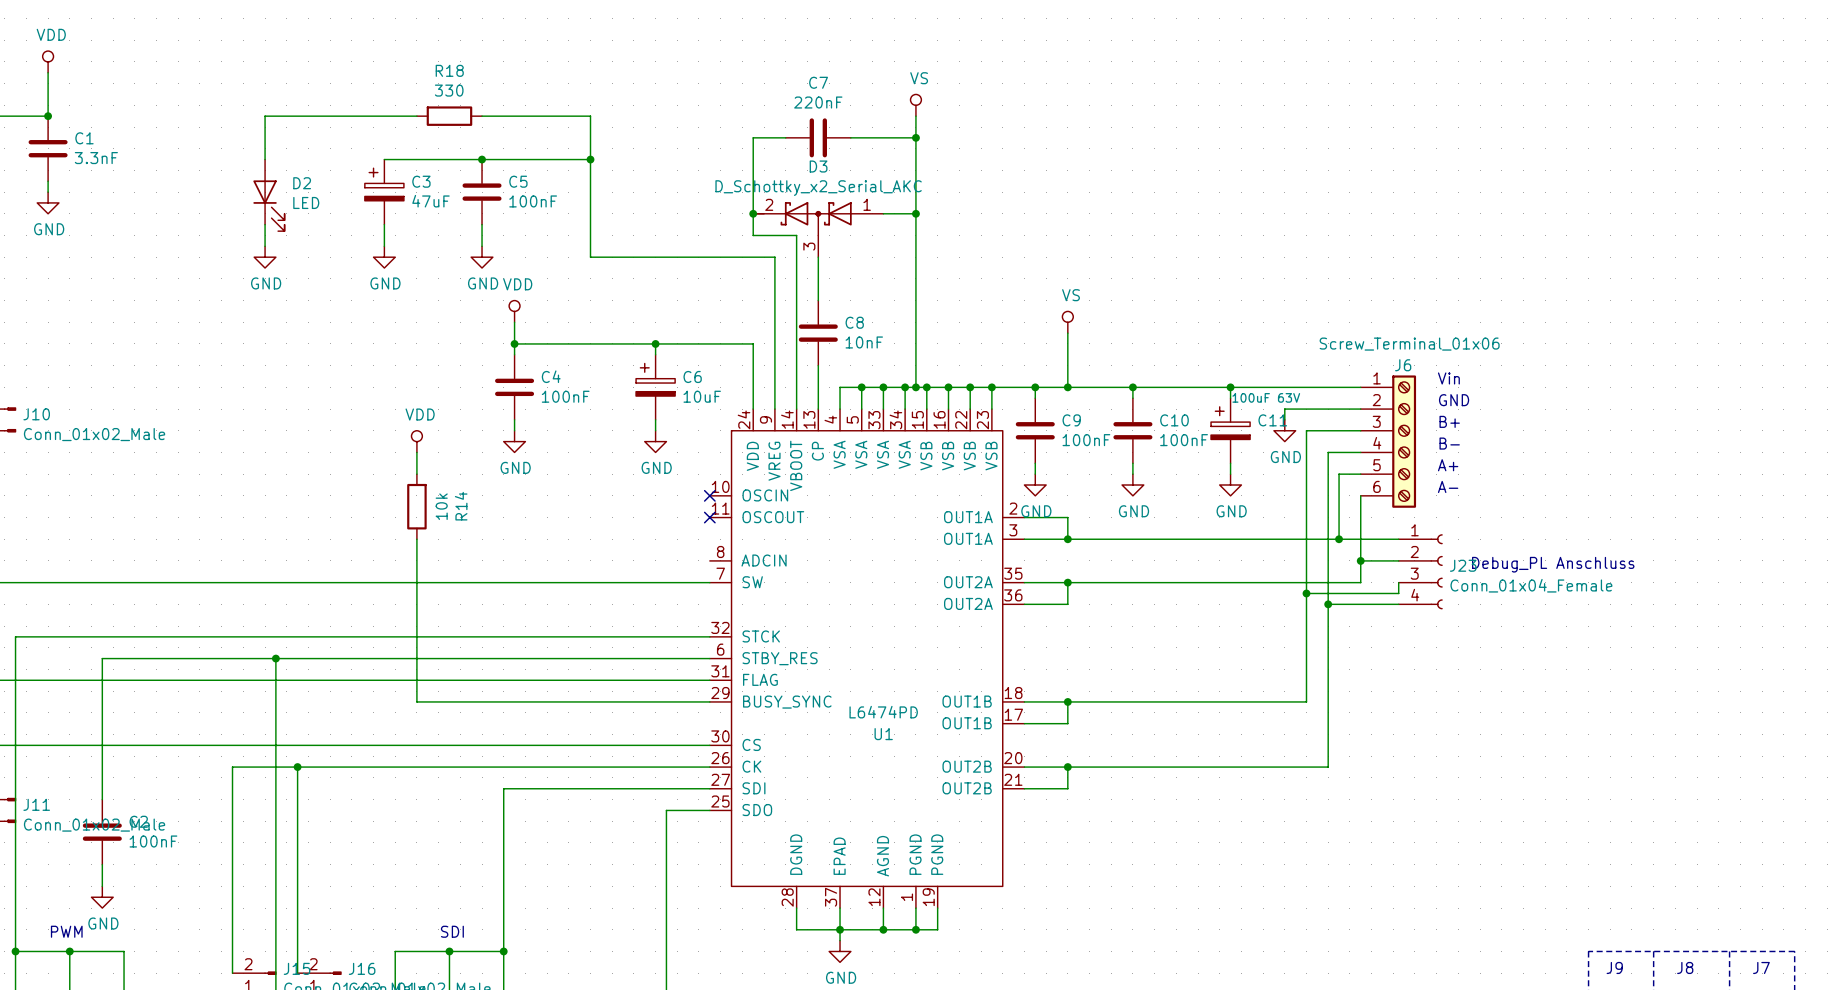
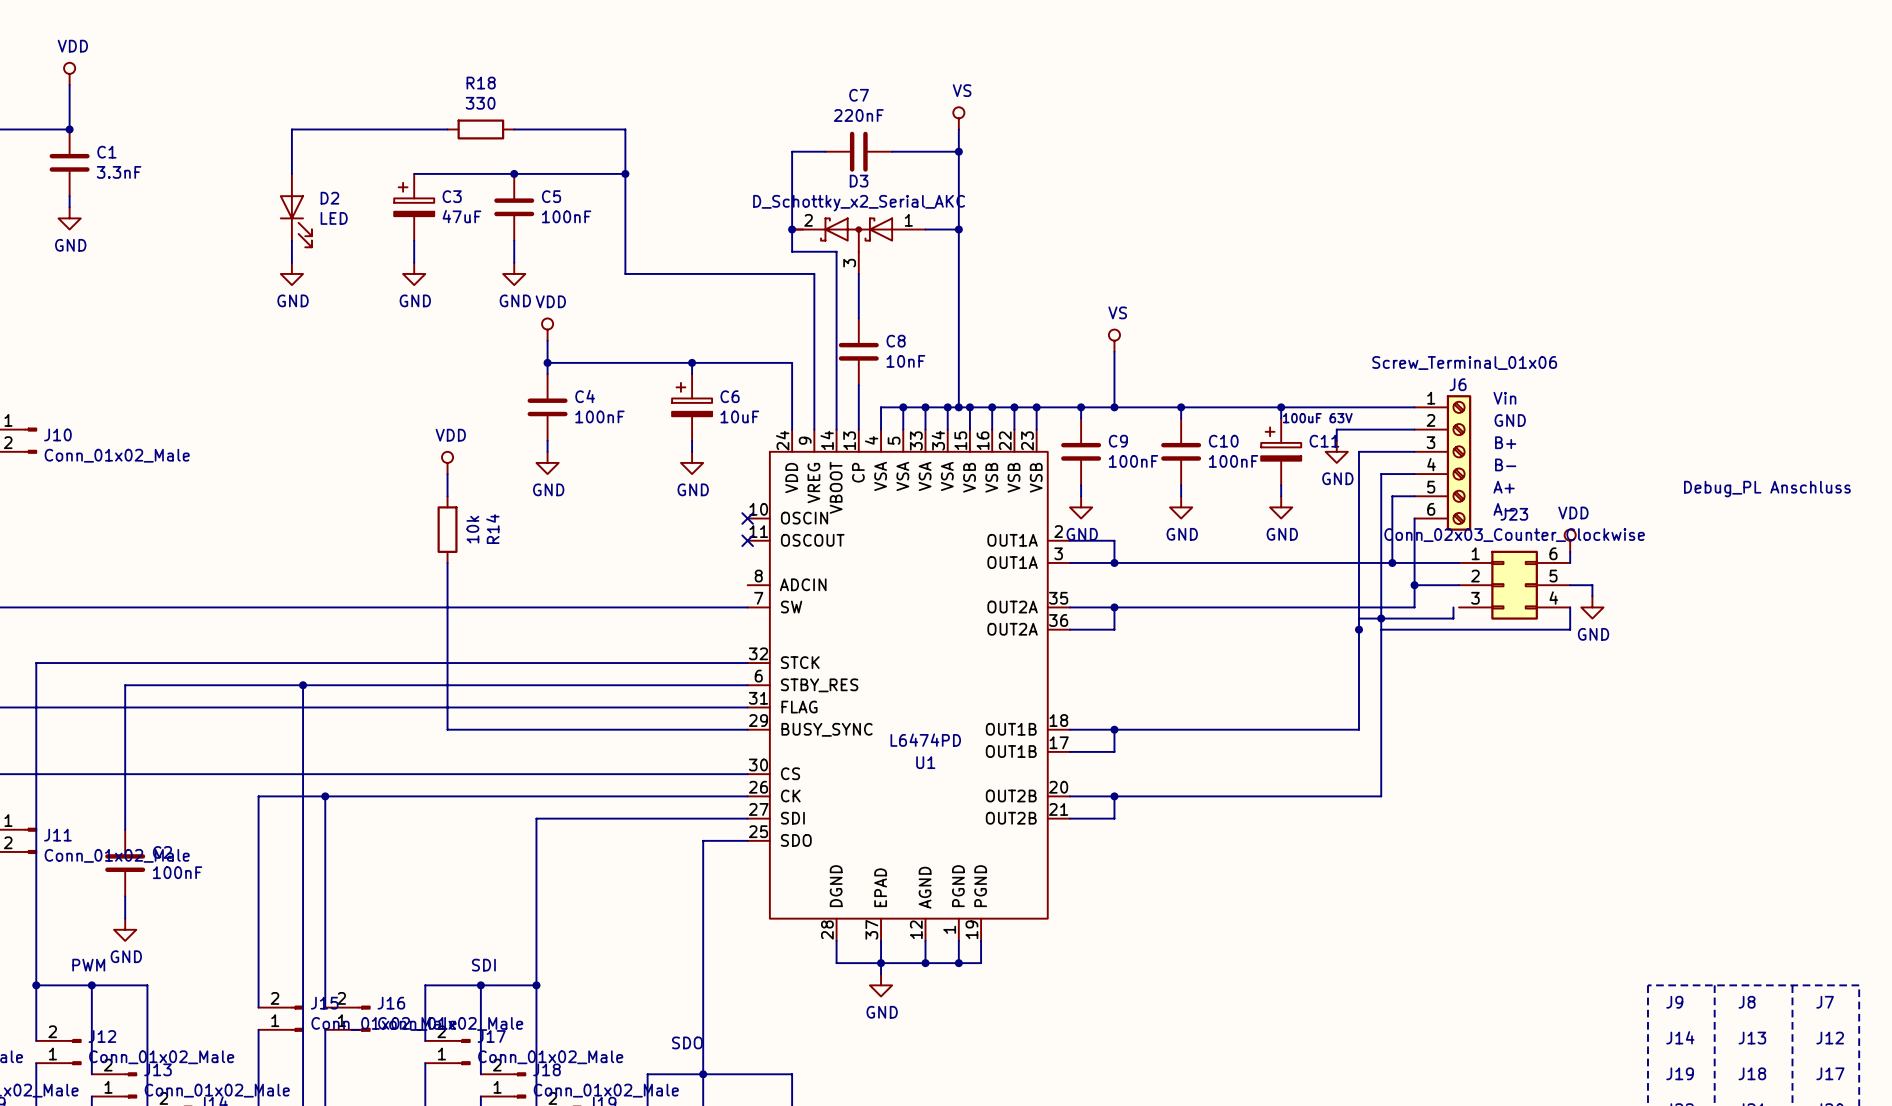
power symbol: none -> VDD (1570, 540)
wire: none -> (1570, 551) (1570, 562)
J23 symbol: [1398, 534, 1443, 610] -> [1459, 550, 1571, 620]
wire: none -> (1570, 585) (1592, 585) (1592, 596)
text position: Debug_PL Anschluss (1553, 564) -> Debug_PL Anschluss (1767, 489)
J23 name position: J23 (1463, 565) -> J23 (1514, 514)
wire: none -> (1570, 607) (1570, 629) (1453, 629)
power symbol: none -> GND (1592, 607)
J23 value: Conn_01x04_Female (1531, 585) -> Conn_02x03_Counter_Clockwise (1514, 535)
junction: (1306, 593) -> none
junction: none -> (1381, 618)
junction: none -> (1358, 629)
junction: (1328, 604) -> none

